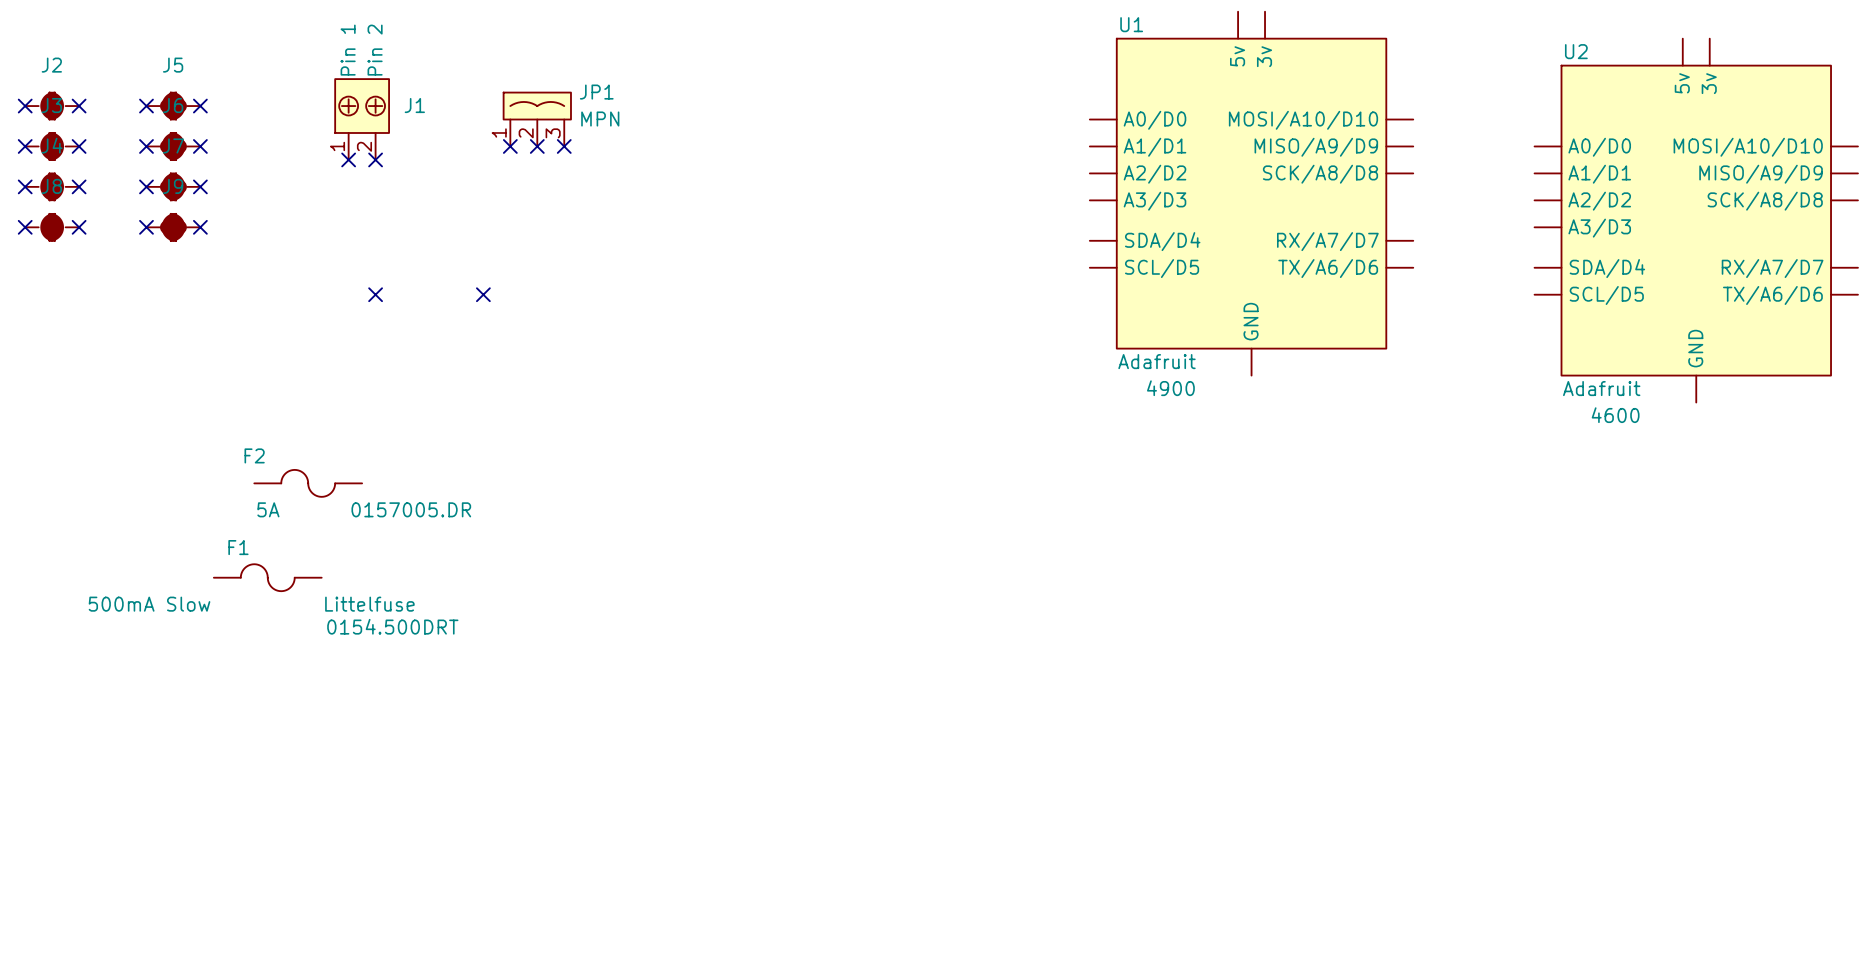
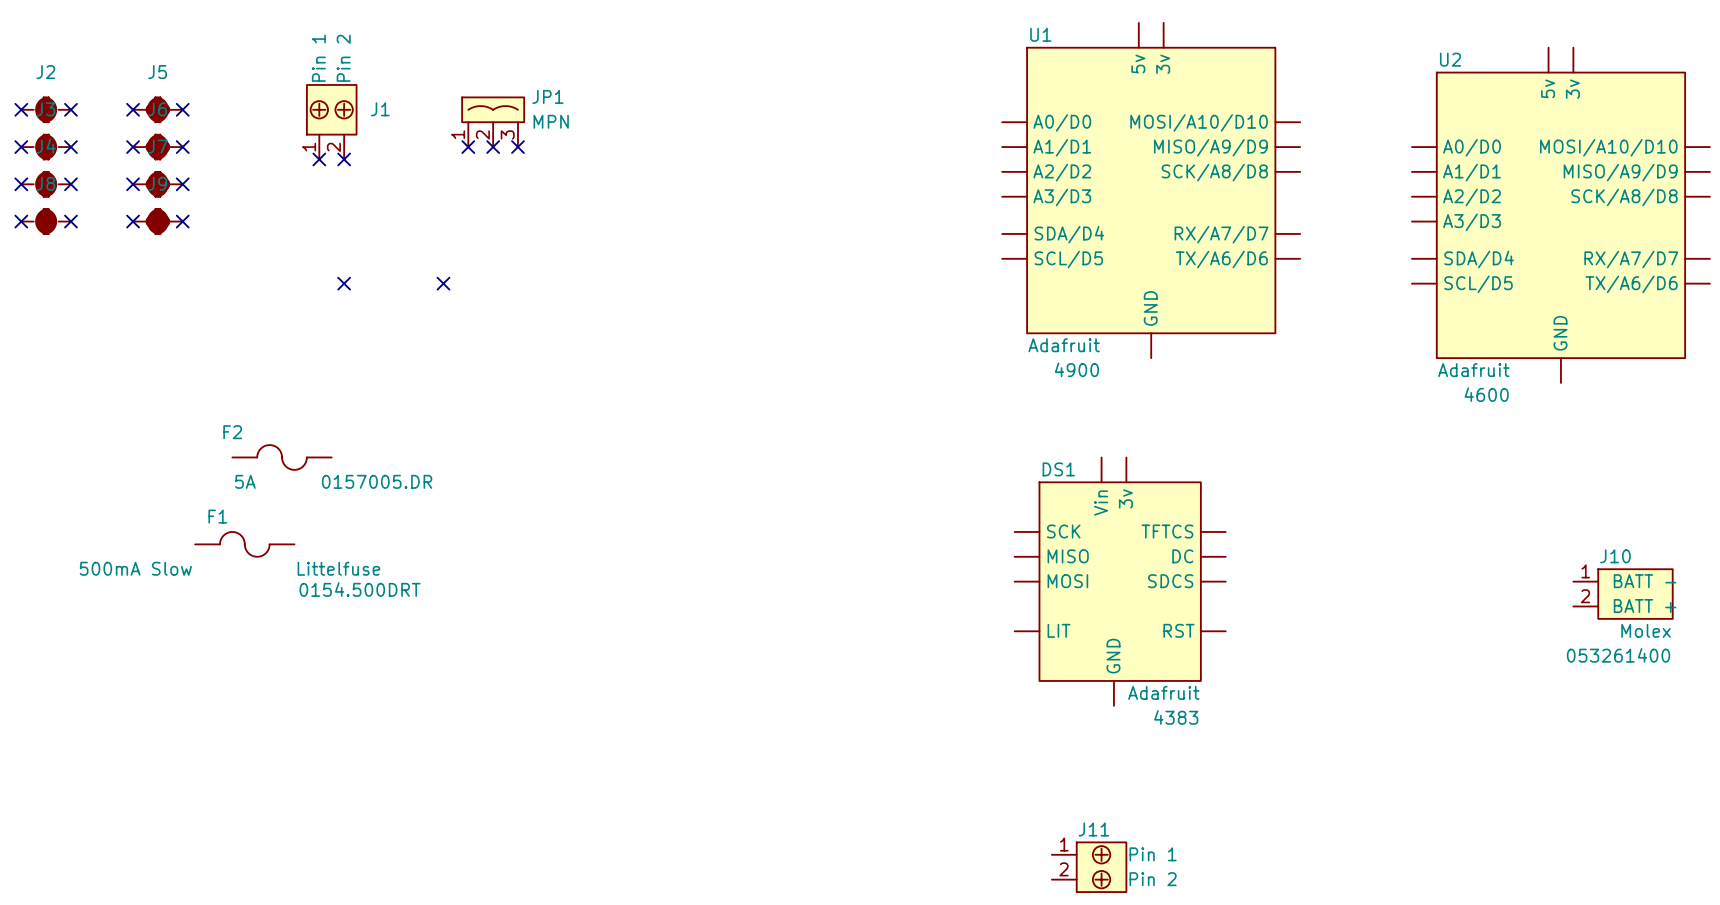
DS1: none -> (1120, 581)
J10: none -> (1623, 594)
J11: none -> (1089, 867)

